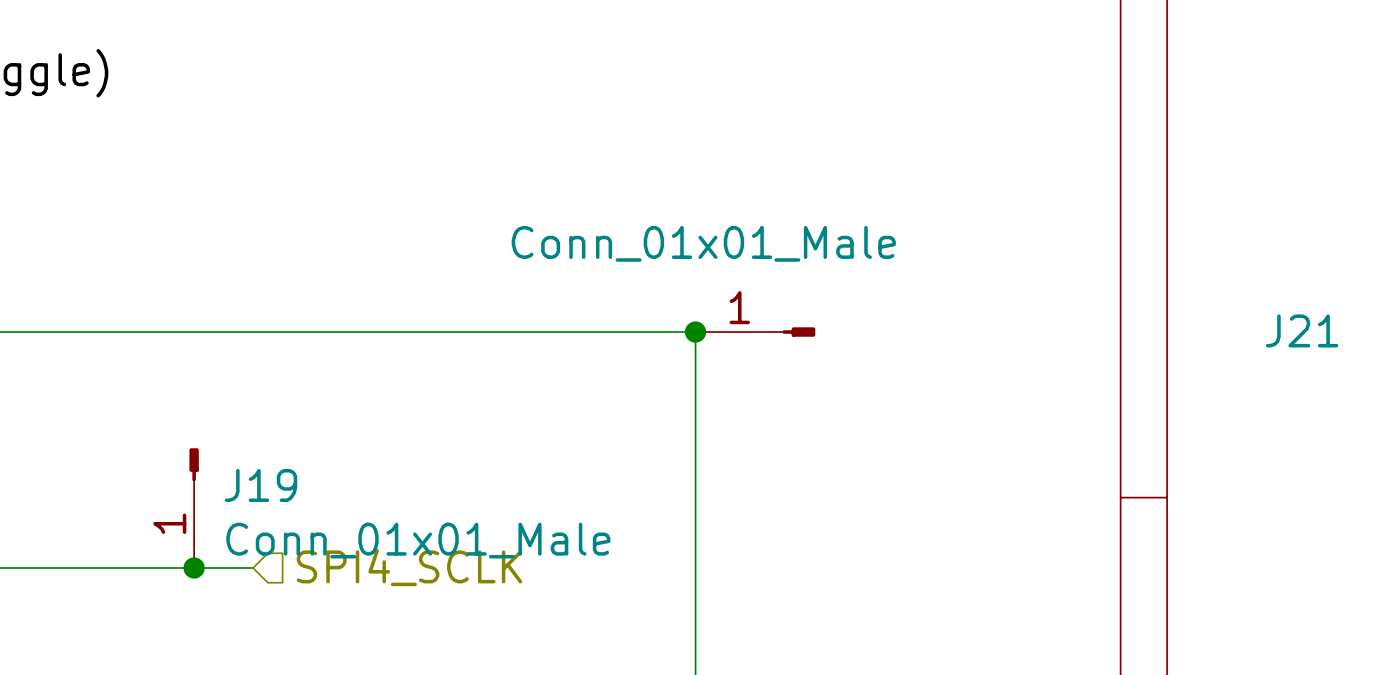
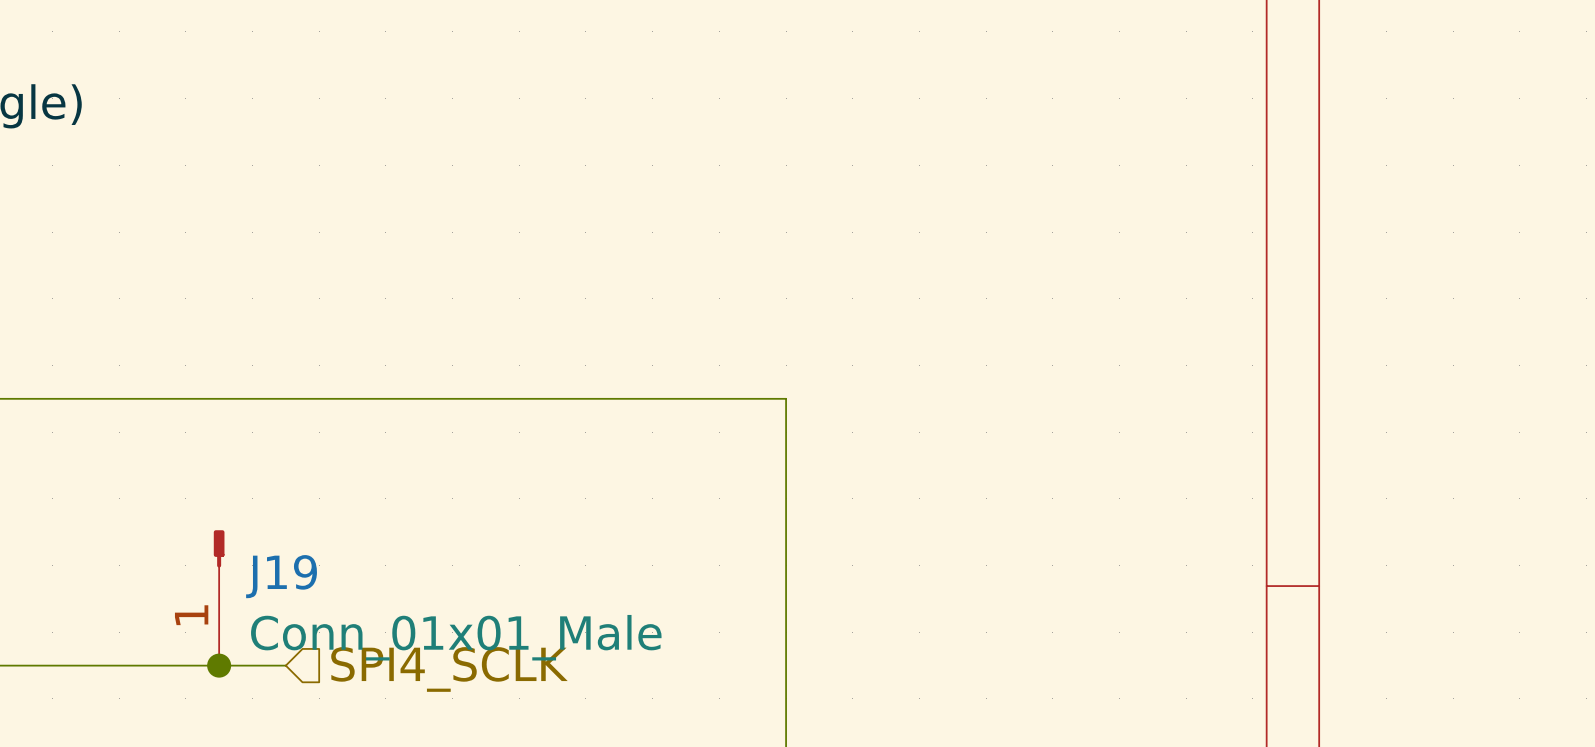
junction: (695, 332) -> none
J21: Conn_01x01_Male (755, 332) -> none

